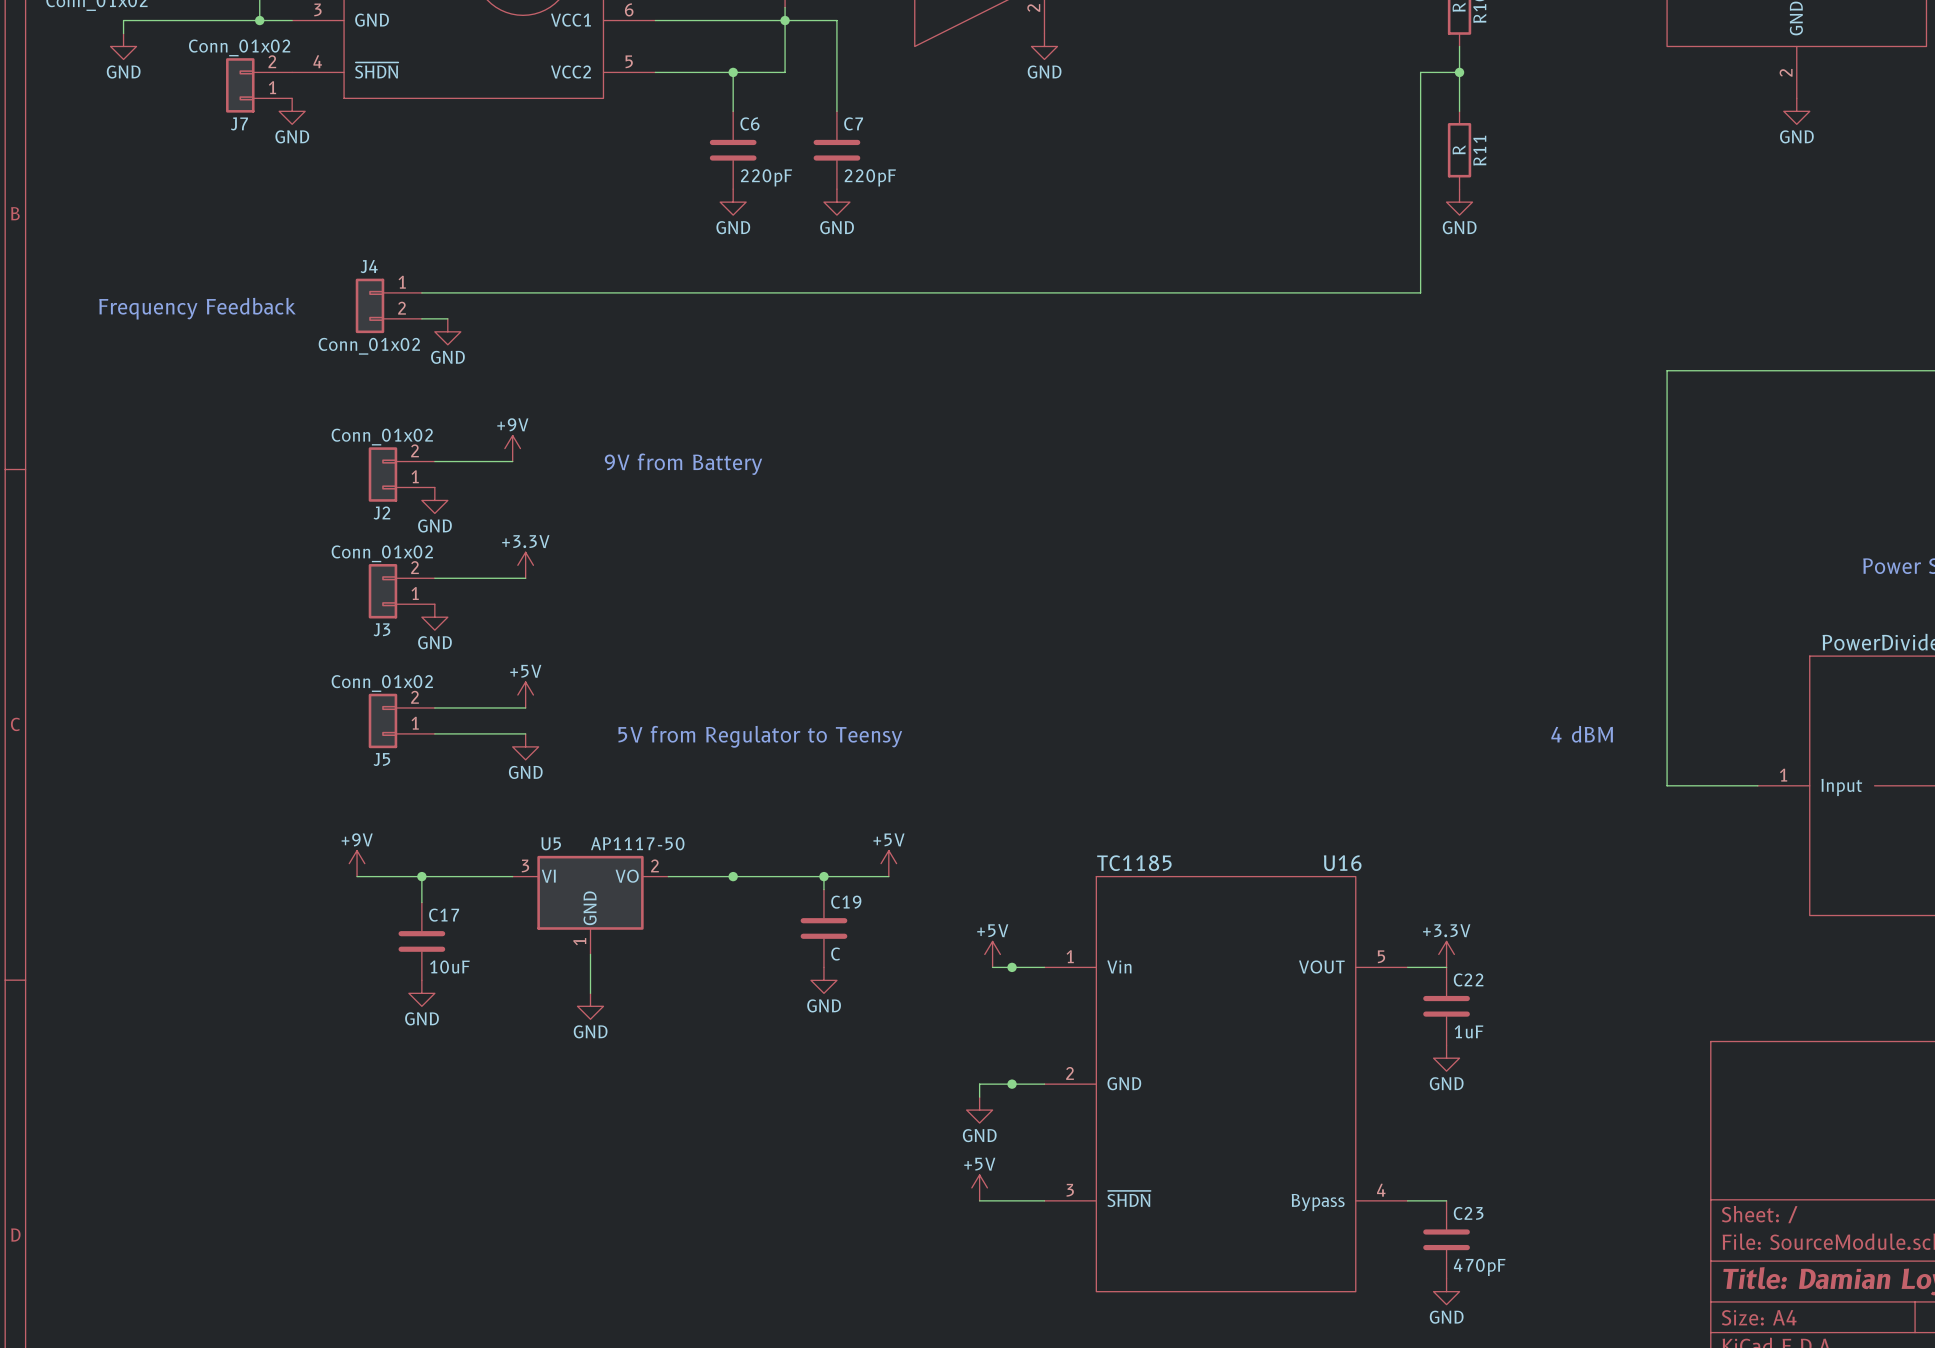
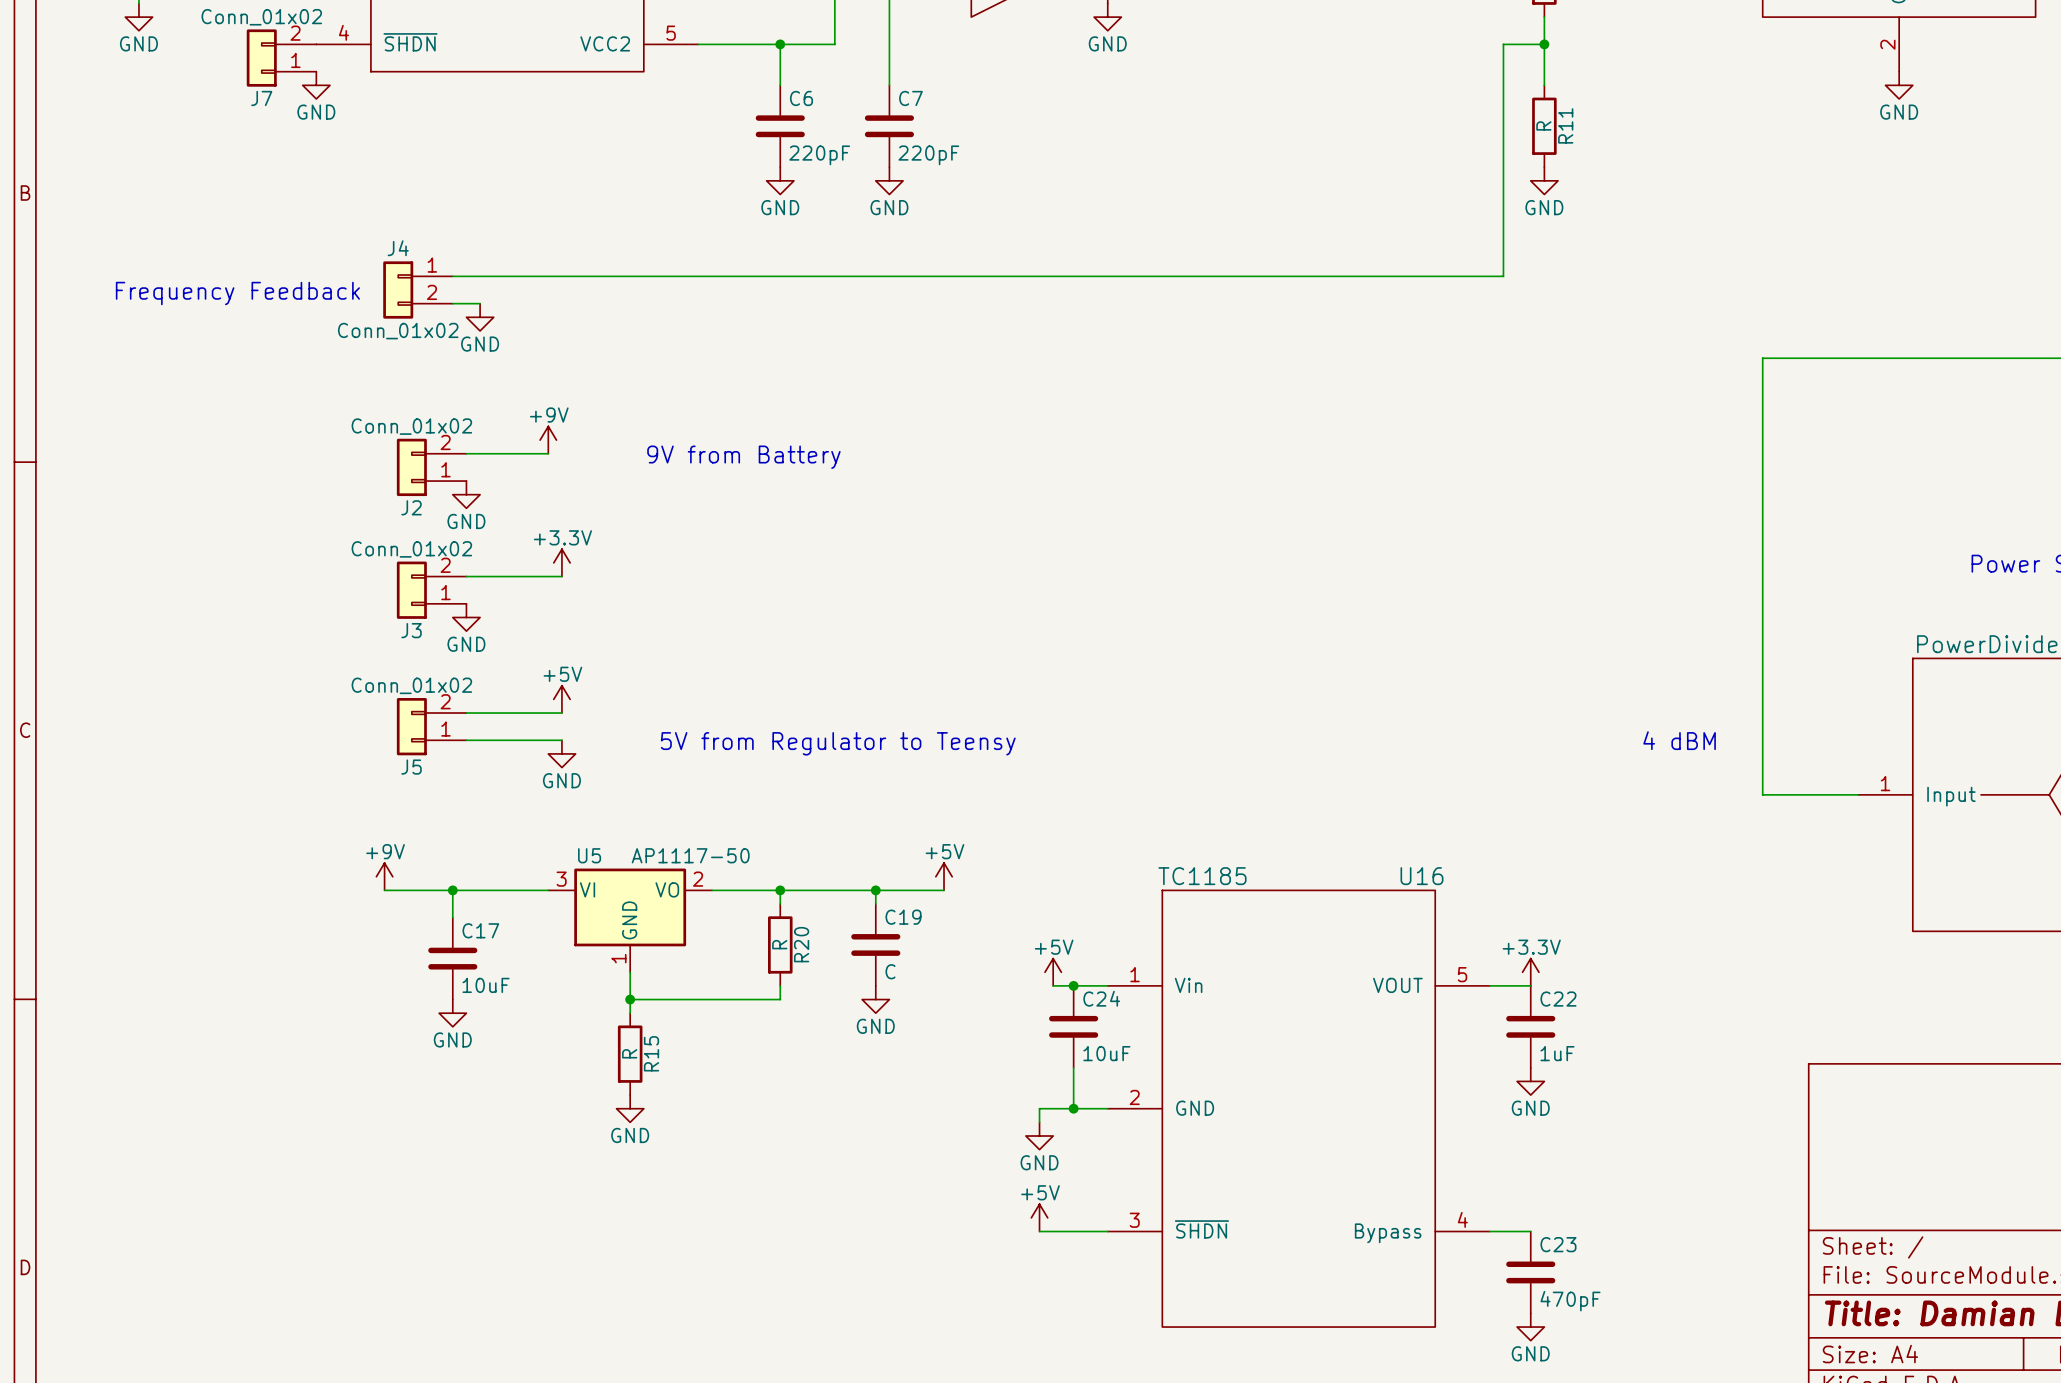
wire: none -> (780, 890) (780, 904)
R20: none -> R (780, 944)
wire: none -> (780, 985) (780, 999) (630, 999)
junction: none -> (630, 999)
power symbol position: GND (590, 1006) -> GND (630, 1108)
C24: none -> 10uF (1073, 1026)
R15: none -> R (630, 1054)
wire: none -> (1073, 1067) (1073, 1108)

